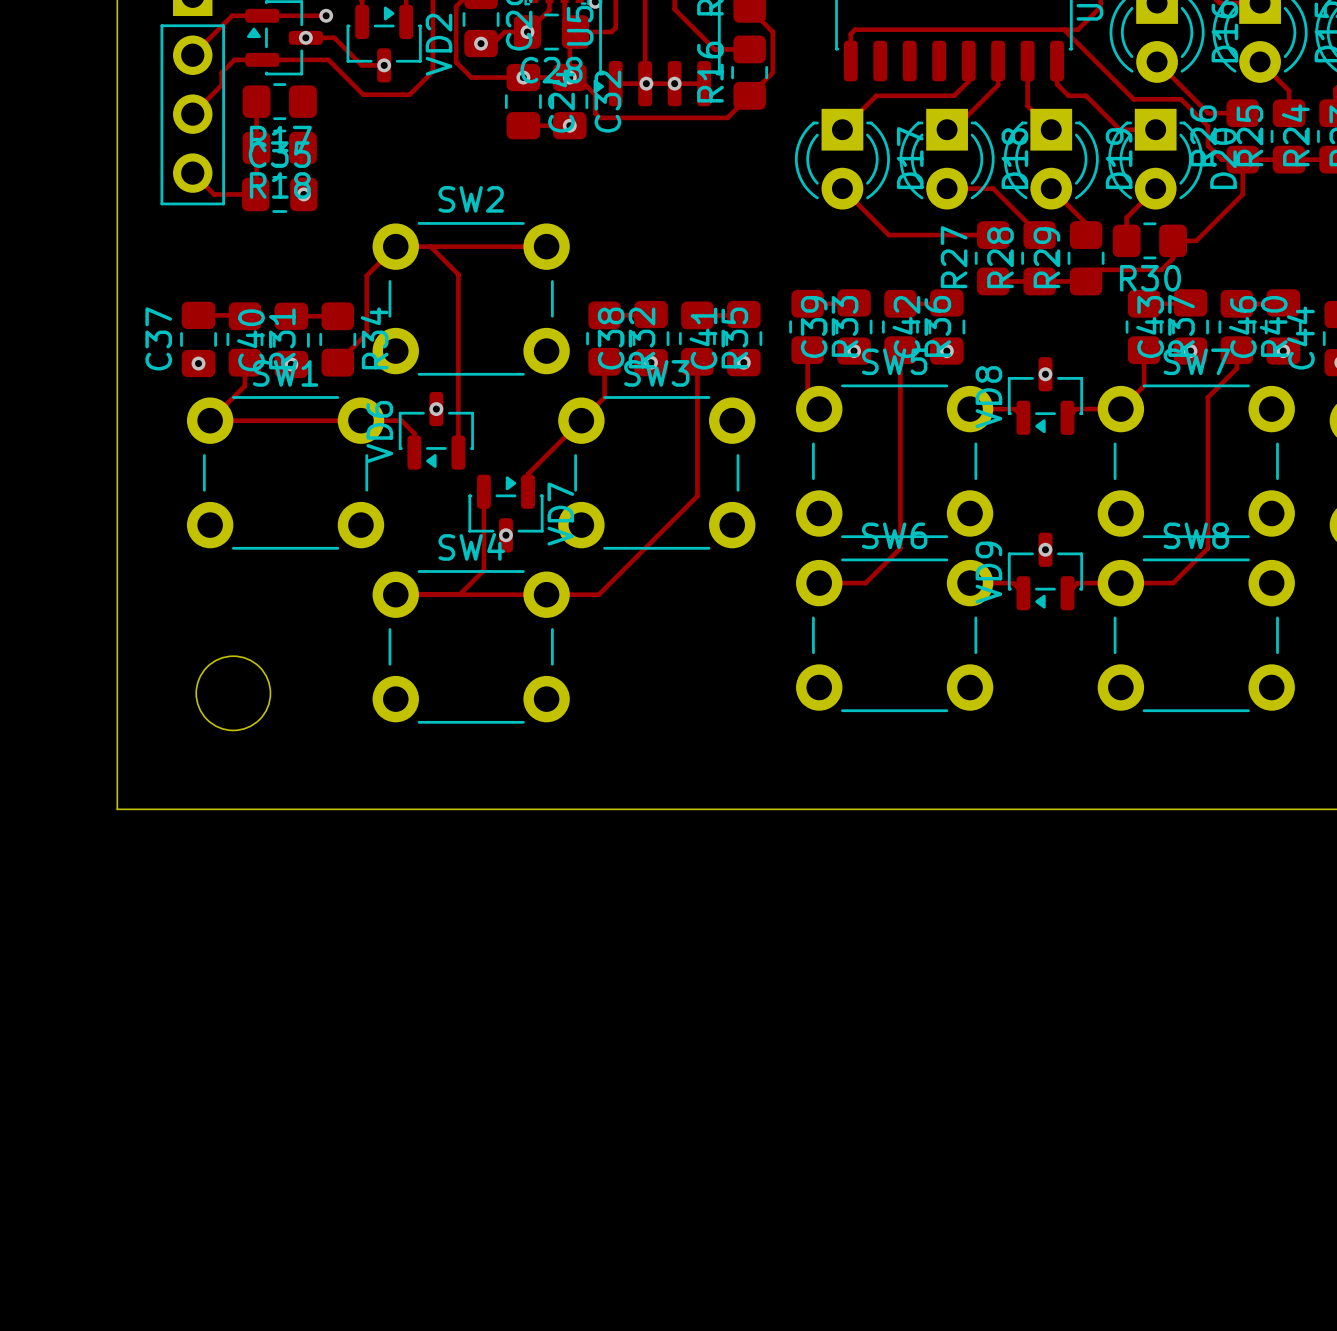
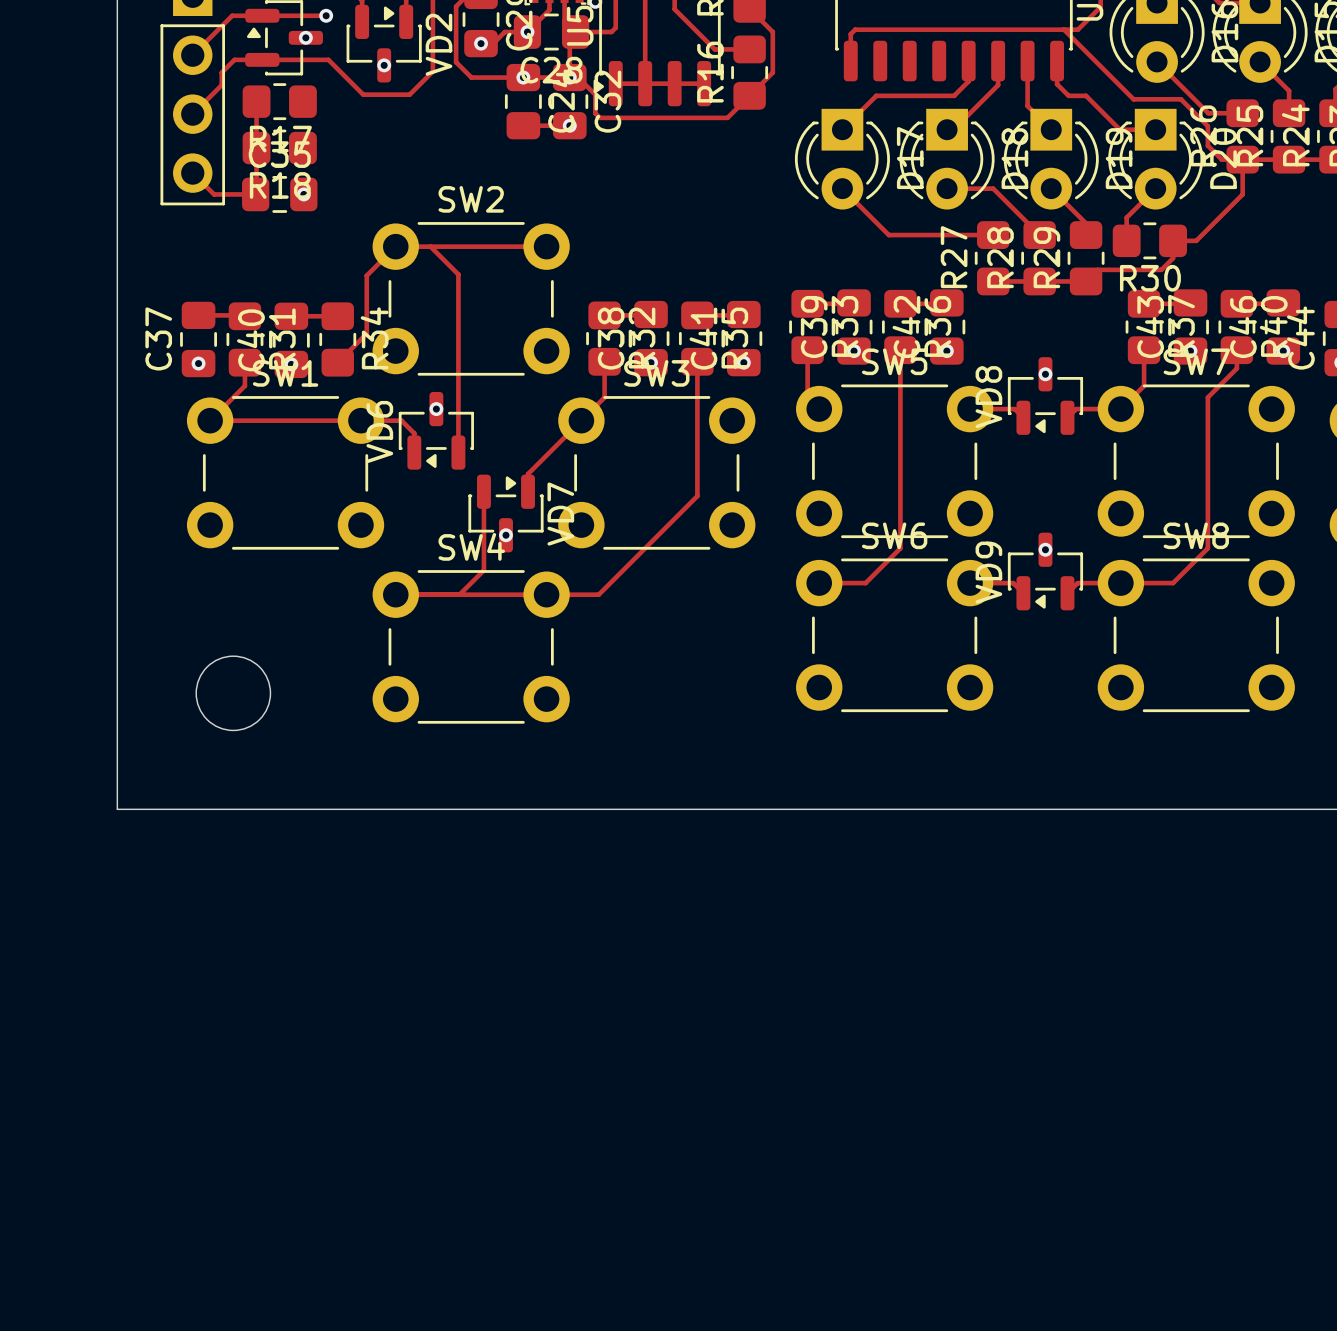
track: (305, 37) (334, 37) (361, 65) (384, 65) -> none
via: (646, 83) -> none
via: (674, 83) -> none

